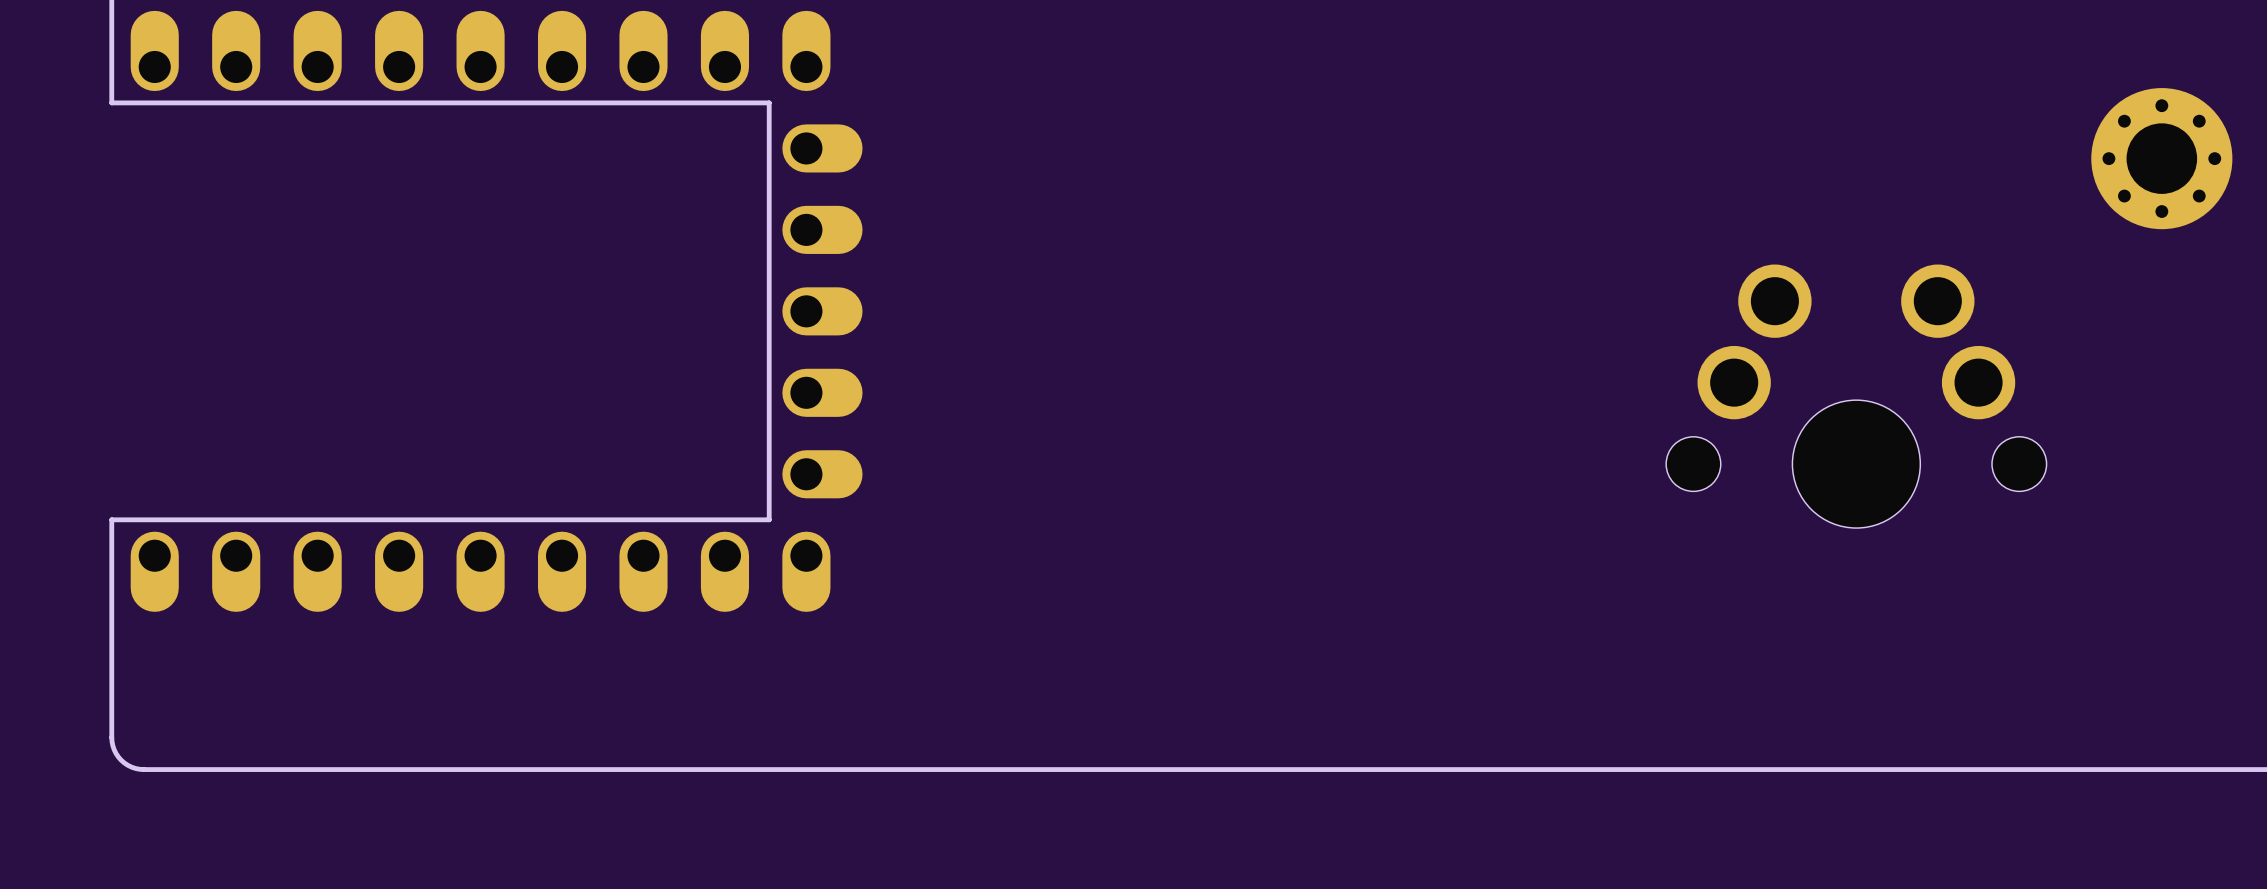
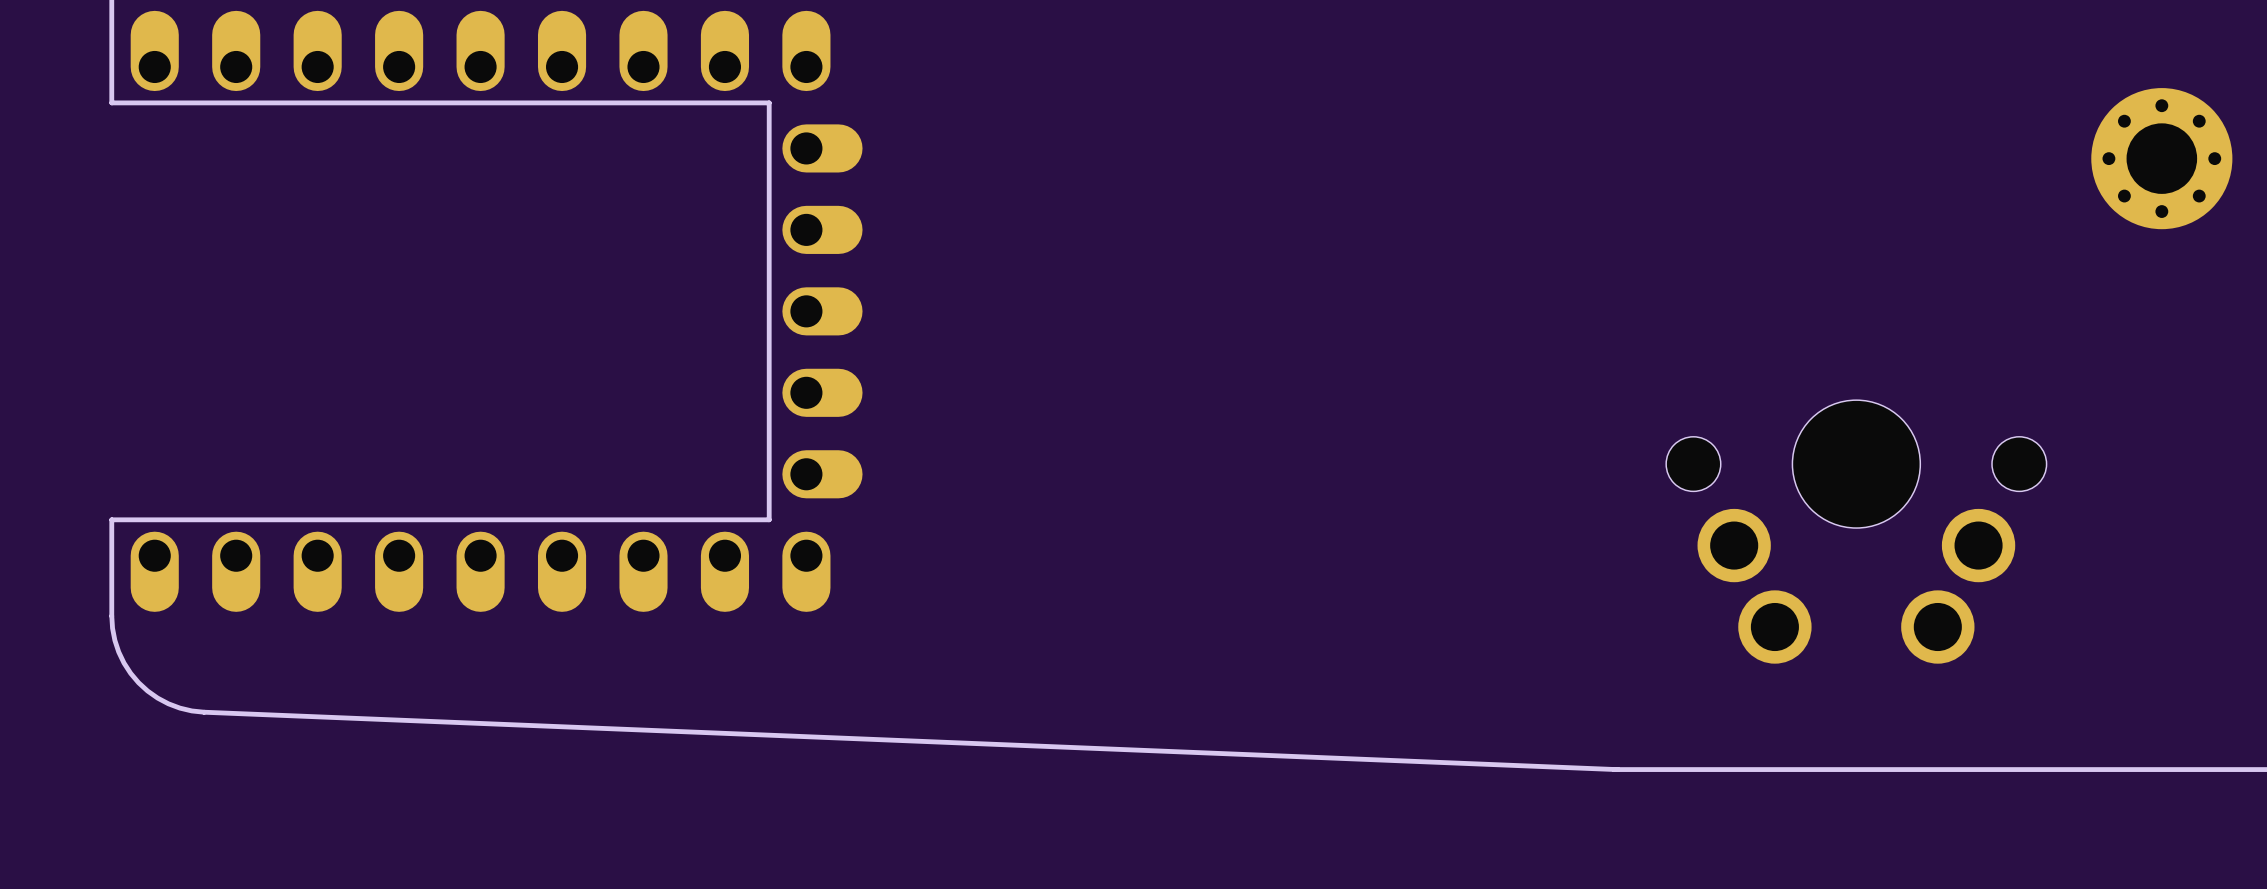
part rotation: 0° (1856, 396) -> 180° (1856, 531)
board edge: (111, 616) (112, 741) (116, 753) (121, 760) (127, 765) (139, 769) (1617, 769) -> (111, 616) (112, 628) (118, 652) (124, 663) (138, 682) (147, 691) (168, 703) (191, 710) (204, 712) (1617, 769)

